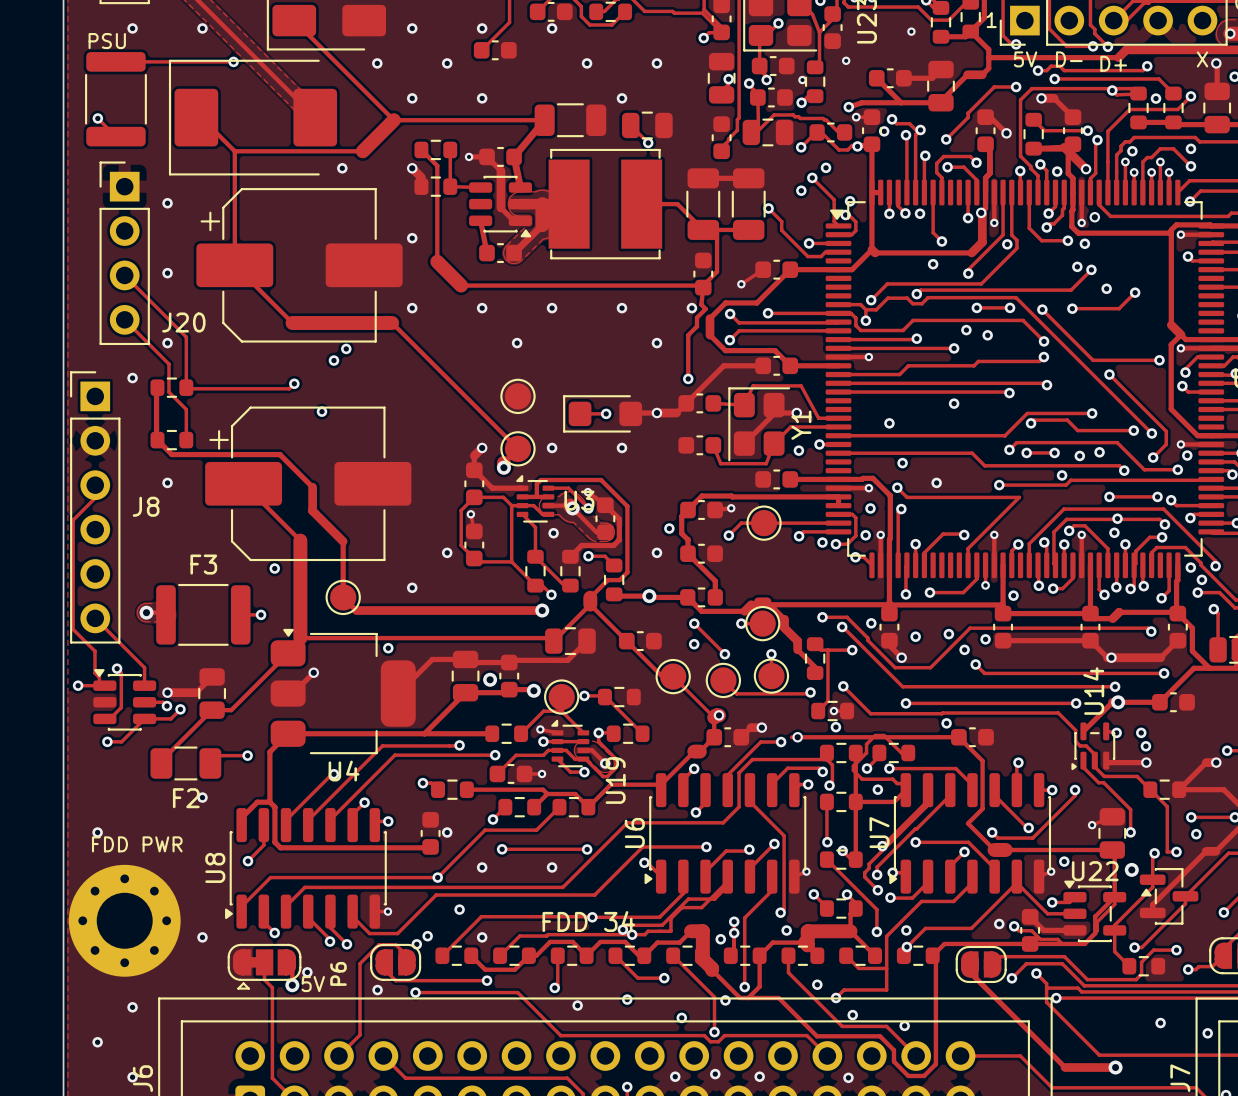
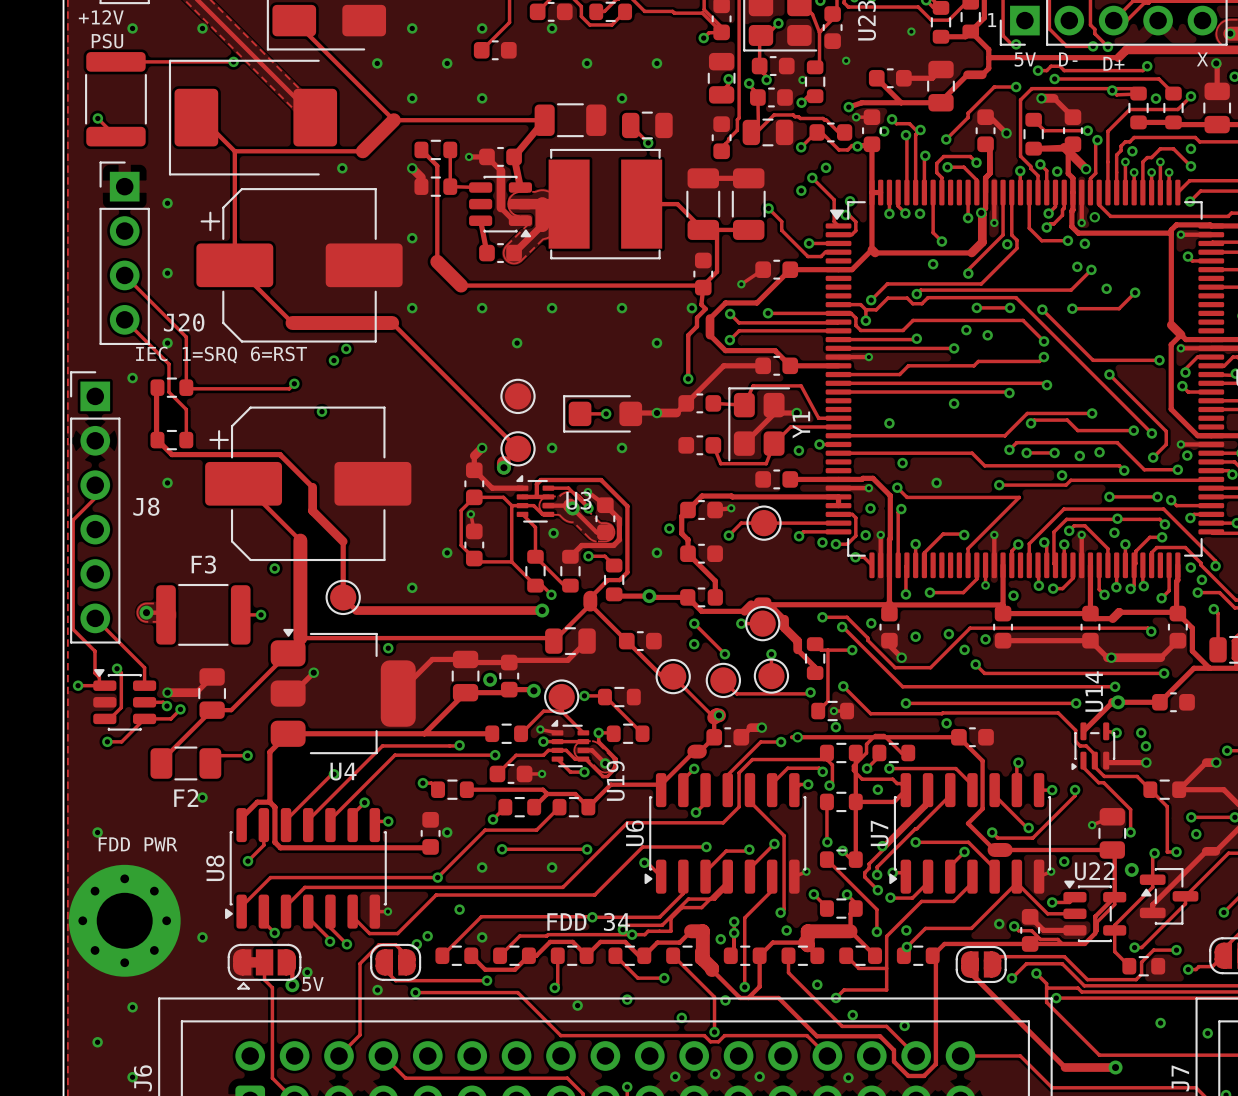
text: none -> +12V (101, 17)
text: none -> IEC 1=SRQ 6=RST (221, 355)
text: P6 (338, 973) -> none

